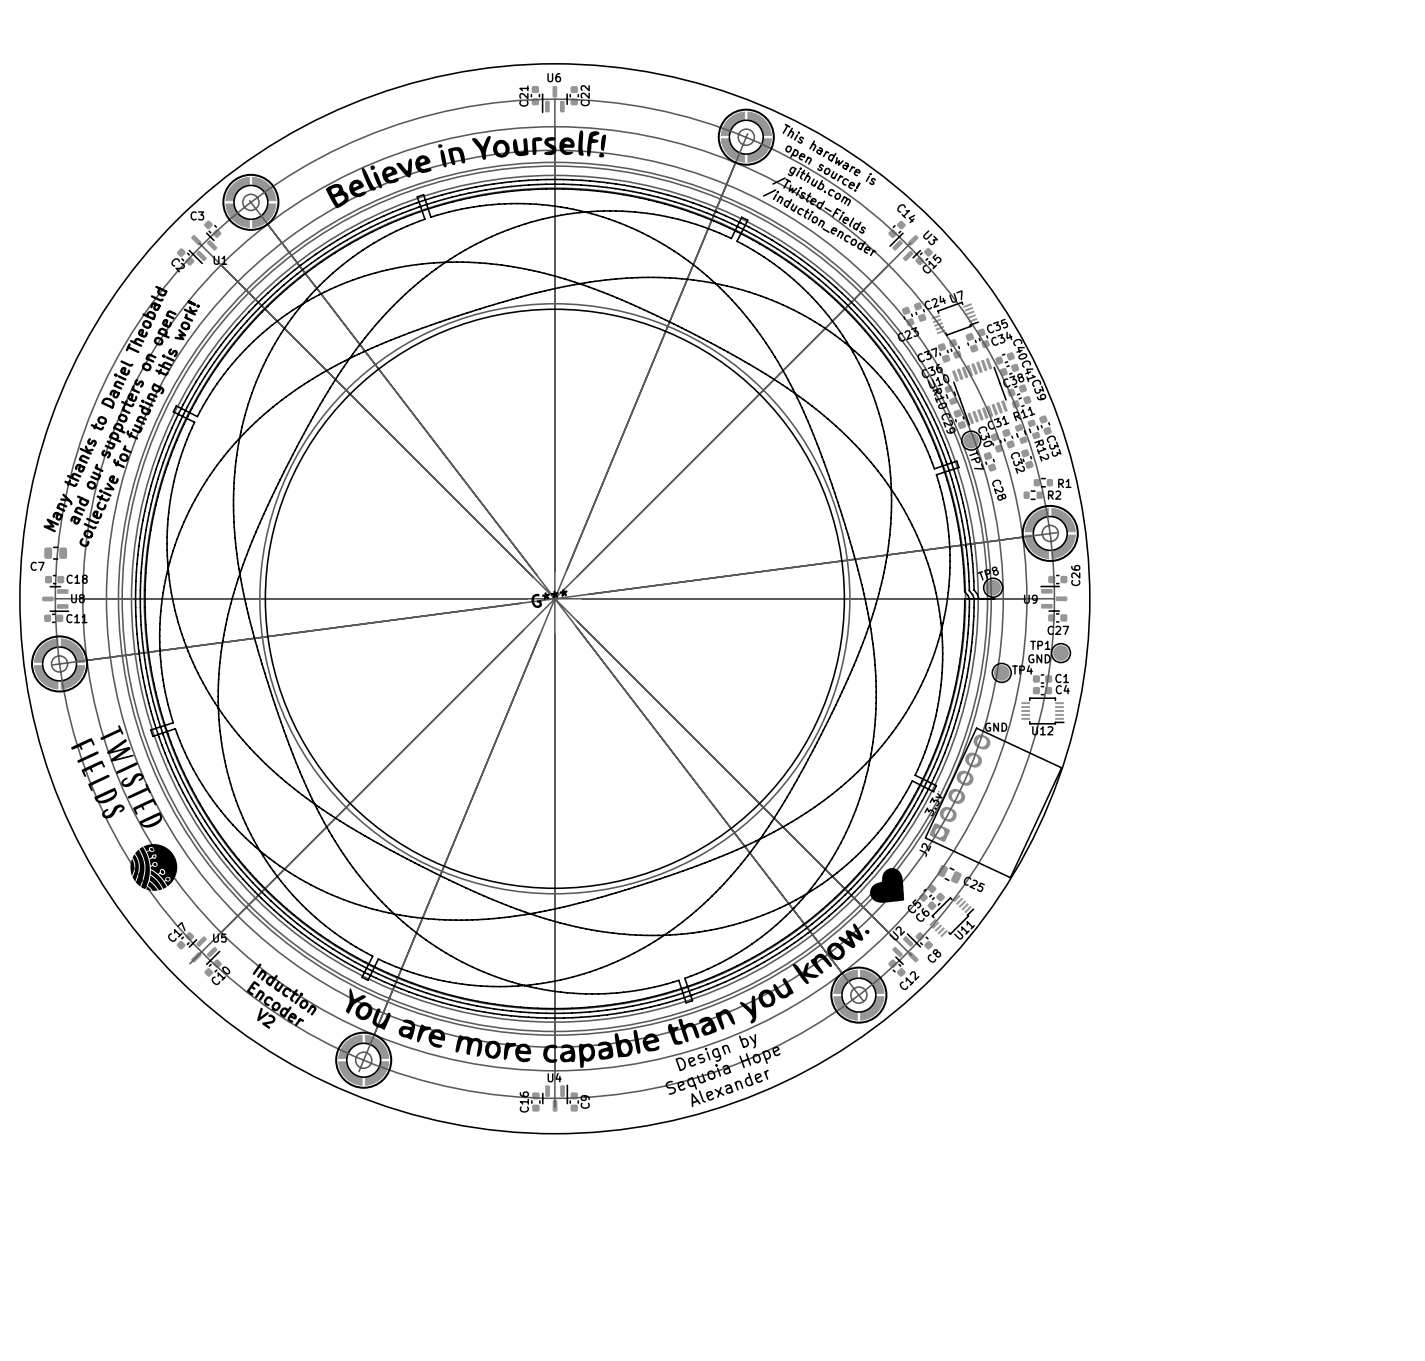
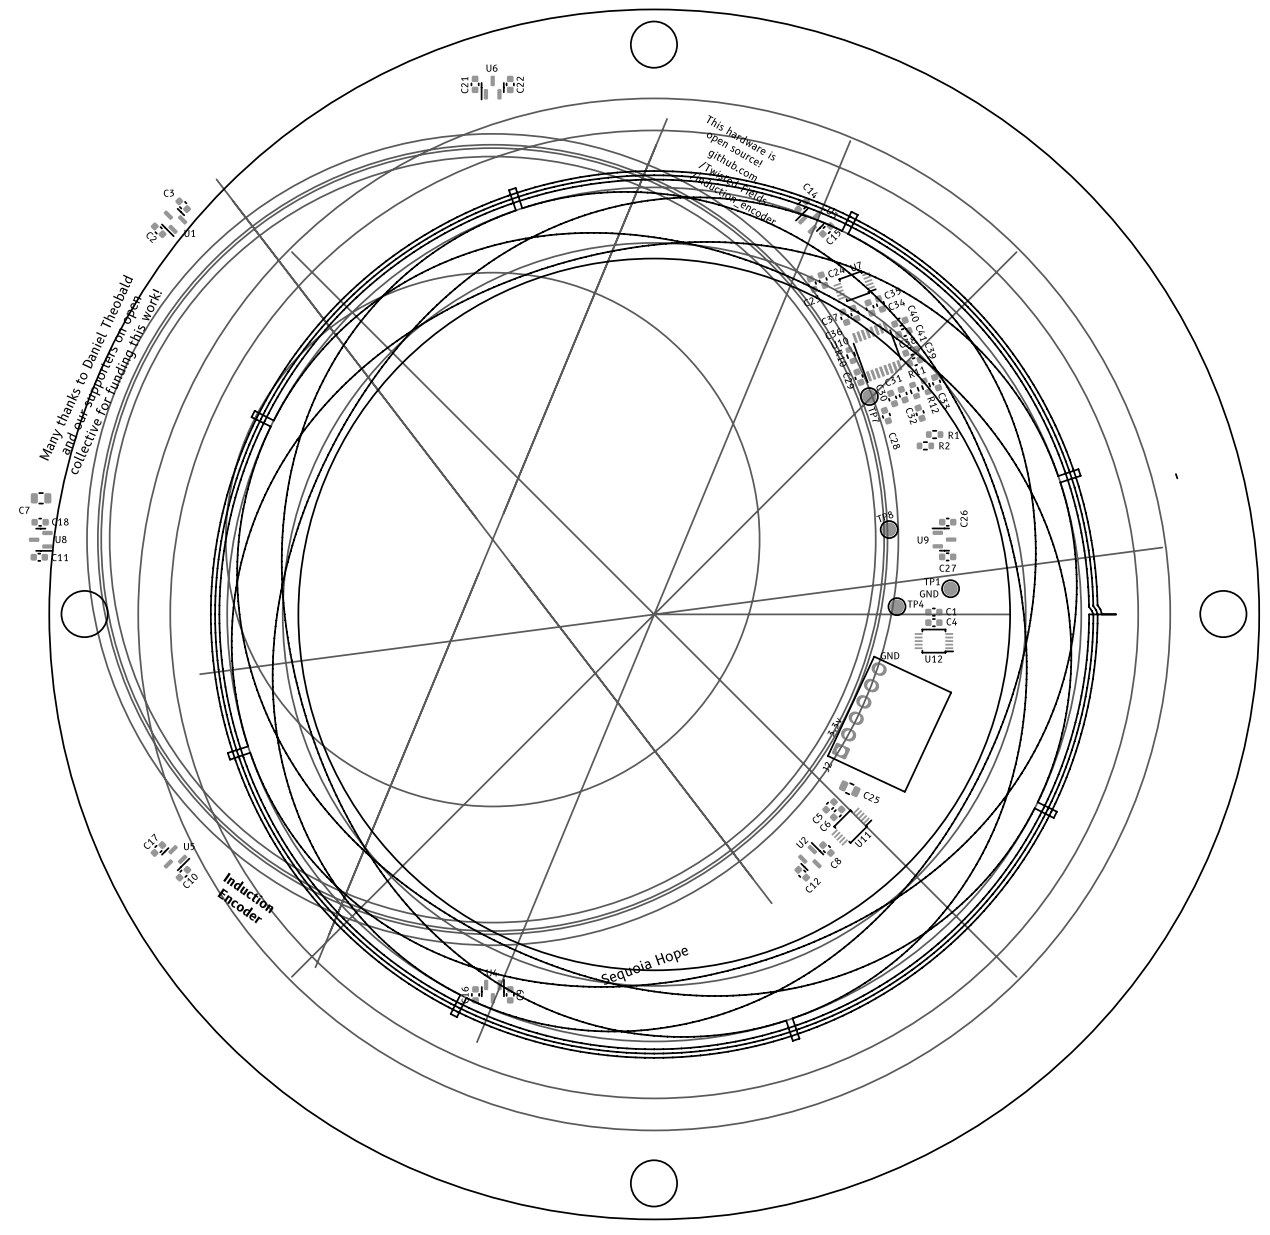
round board edge: none -> [49, 9, 1260, 1220]
round board edge: none -> [630, 20, 678, 69]
round board edge: [19, 63, 1091, 1134] -> none
drawing: [54, 98, 1055, 1099] -> none
line: (554, 99) (554, 1106) -> none
drawing: none -> [137, 98, 1171, 1131]
part: (746, 137) -> none
line: none -> (850, 140) (477, 1042)
part: (250, 202) -> none
line: (585, 212) (622, 211) (659, 215) (696, 224) (731, 238) (741, 217) (747, 220) (737, 241) (769, 260) (798, 284) (824, 311) (849, 346) -> none
line: (585, 212) (542, 204) (504, 203) (467, 207) (430, 217) (423, 194) (417, 196) (424, 219) (390, 234) (357, 253) (328, 276) (302, 303) -> none
line: (585, 212) (620, 223) (653, 238) (683, 257) (715, 283) -> none
line: (585, 212) (548, 217) (513, 227) (480, 241) (445, 262) -> none
line: none -> (687, 197) (725, 206) (762, 220) (796, 237) (834, 261)
line: none -> (687, 197) (647, 200) (609, 208) (572, 219) (531, 237)
line: none -> (687, 197) (726, 198) (766, 204) (804, 215) (842, 230) (851, 211) (857, 214) (848, 233) (882, 254) (914, 278) (943, 306) (972, 342)
line: none -> (687, 197) (640, 192) (600, 192) (561, 198) (522, 208) (515, 187) (509, 190) (515, 210) (478, 225) (443, 245) (411, 269) (382, 296)
line: (199, 243) (911, 955) -> none
line: (910, 243) (189, 963) -> none
line: (445, 262) (479, 262) (512, 266) (579, 283) -> none
line: (445, 262) (404, 266) (369, 274) (335, 286) (302, 303) -> none
line: (445, 262) (418, 282) (393, 305) (349, 358) -> none
line: none -> (531, 237) (569, 233) (606, 233) (642, 235) (683, 242)
line: none -> (531, 237) (499, 256) (469, 277) (441, 301) (411, 330)
line: none -> (531, 237) (488, 246) (451, 259) (416, 275) (382, 296)
line: none -> (683, 242) (750, 261) (819, 291) (882, 328) (937, 372)
line: none -> (683, 242) (725, 242) (761, 245) (797, 251) (834, 261)
line: none -> (683, 242) (614, 250) (542, 269) (472, 296) (411, 330)
line: none -> (291, 252) (1016, 976)
line: none -> (1016, 252) (291, 976)
line: (579, 283) (630, 303) (690, 332) (749, 364) (795, 393) -> none
line: (579, 283) (526, 295) (462, 314) (399, 336) (349, 358) -> none
line: (715, 283) (739, 308) (759, 334) (795, 393) -> none
line: (715, 283) (755, 293) (788, 307) (820, 325) (849, 346) -> none
line: (715, 283) (681, 278) (648, 277) (579, 283) -> none
round board edge: none -> [298, 258, 1011, 971]
line: none -> (834, 261) (875, 277) (909, 295) (942, 317) (972, 342)
line: none -> (834, 261) (863, 284) (889, 310) (913, 338) (937, 372)
line: (302, 303) (281, 333) (263, 365) (250, 398) (239, 438) -> none
line: (302, 303) (267, 328) (240, 354) (216, 384) (197, 416) (176, 405) (173, 411) (194, 422) (180, 457) (171, 493) (167, 531) (168, 568) -> none
round board edge: [265, 309, 845, 889] -> none
line: none -> (382, 296) (346, 325) (318, 353) (294, 385) (273, 420) (254, 410) (251, 417) (270, 426) (255, 463) (244, 502) (238, 541) (237, 581)
line: none -> (382, 296) (357, 326) (335, 358) (317, 393) (301, 434)
line: (849, 346) (876, 372) (900, 401) (919, 434) (934, 468) (956, 461) (958, 467) (936, 474) (945, 511) (949, 548) (948, 586) (941, 629) -> none
line: (849, 346) (866, 379) (879, 413) (887, 448) (891, 489) -> none
line: (349, 358) (320, 404) (288, 463) (259, 523) (239, 573) -> none
line: (349, 358) (290, 393) (264, 414) (239, 438) -> none
line: none -> (411, 330) (368, 385) (330, 449) (301, 517) (282, 585)
line: none -> (411, 330) (378, 355) (350, 378) (324, 405) (301, 434)
line: none -> (972, 342) (992, 376) (1009, 411) (1021, 448) (1031, 491)
line: none -> (972, 342) (999, 371) (1023, 404) (1042, 438) (1058, 476) (1078, 469) (1080, 475) (1060, 482) (1070, 521) (1075, 561) (1076, 601) (1071, 647)
line: (795, 393) (817, 443) (839, 506) (858, 570) (869, 623) -> none
line: (795, 393) (848, 437) (870, 462) (891, 489) -> none
line: none -> (937, 372) (967, 401) (991, 429) (1012, 459) (1031, 491)
line: none -> (937, 372) (972, 433) (999, 502) (1017, 574) (1026, 643)
line: (239, 438) (234, 472) (233, 505) (239, 573) -> none
line: (239, 438) (213, 469) (194, 500) (179, 533) (168, 568) -> none
line: none -> (301, 434) (291, 470) (285, 507) (282, 543) (282, 585)
line: none -> (301, 434) (277, 471) (259, 506) (246, 543) (237, 581)
line: (891, 489) (890, 523) (886, 556) (869, 623) -> none
line: (891, 489) (911, 524) (925, 557) (936, 592) (941, 629) -> none
line: none -> (1175, 474) (1177, 478)
line: (1056, 532) (52, 664) -> none
part: (1050, 533) -> none
line: none -> (1031, 491) (1035, 529) (1035, 566) (1032, 602) (1026, 643)
line: none -> (1031, 491) (1049, 532) (1060, 569) (1068, 607) (1071, 647)
line: (168, 568) (173, 604) (183, 639) (197, 672) (218, 708) -> none
line: (168, 568) (160, 611) (159, 648) (164, 686) (173, 722) (150, 730) (152, 736) (175, 728) (190, 763) (209, 795) (232, 824) (259, 850) -> none
line: (239, 573) (222, 640) (218, 673) (218, 708) -> none
line: (239, 573) (251, 627) (270, 691) (292, 753) (314, 804) -> none
line: (974, 589) (970, 546) (963, 503) (950, 460) (937, 428) (918, 389) (894, 352) (866, 318) (841, 293) (808, 264) (779, 244) (749, 227) (709, 208) (667, 194) (624, 185) (581, 180) (546, 179) (502, 182) (459, 190) (416, 202) (384, 215) (345, 235) (308, 259) (274, 287) (249, 311) (220, 345) (200, 374) (183, 404) (165, 444) (151, 486) (141, 528) (136, 572) (135, 607) (141, 668) (156, 728) (179, 785) (210, 838) (249, 885) (294, 927) (345, 961) (400, 988) (459, 1007) (519, 1016) (581, 1017) (642, 1008) (701, 991) (756, 966) (808, 932) (854, 892) (894, 845) (926, 793) (950, 736) (966, 677) (971, 642) (973, 625) (973, 616) (974, 607) (974, 598) (972, 594) (969, 590) (966, 546) (958, 504) (937, 438) (909, 384) (874, 334) (832, 290) (784, 253) (731, 223) (674, 201) (615, 188) (554, 184) (494, 188) (435, 201) (378, 223) (325, 253) (277, 290) (235, 334) (200, 384) (169, 446) (151, 504) (141, 564) (141, 624) (149, 684) (169, 751) (195, 806) (229, 856) (271, 901) (311, 934) (362, 966) (410, 987) (468, 1004) (528, 1012) (580, 1012) (632, 1006) (682, 993) (731, 973) (777, 948) (819, 918) (862, 876) (900, 828) (926, 783) (946, 735) (962, 676) (968, 633) (969, 616) (969, 607) (969, 598) (967, 595) (964, 591) (962, 555) (955, 513) (939, 455) (914, 401) (886, 357) (847, 312) (809, 277) (759, 243) (713, 220) (665, 204) (614, 193) (563, 188) (503, 192) (444, 204) (396, 220) (349, 243) (300, 277) (262, 312) (223, 357) (195, 401) (170, 455) (155, 505) (146, 564) (145, 624) (152, 675) (167, 733) (187, 781) (213, 825) (250, 873) (287, 909) (335, 944) (388, 973) (436, 991) (486, 1002) (537, 1008) (597, 1006) (648, 997) (697, 982) (744, 962) (788, 935) (829, 903) (865, 866) (891, 832) (922, 781) (947, 717) (960, 658) (964, 598) (994, 598) -> none
line: (974, 590) (978, 598) -> none
line: (55, 598) (1054, 598) -> none
G***: (597, 599) -> none
line: none -> (1162, 547) (200, 674)
line: (869, 623) (849, 674) (821, 734) (789, 792) (760, 839) -> none
line: (869, 623) (876, 692) (874, 725) (870, 759) -> none
line: (941, 629) (930, 664) (914, 697) (895, 727) (870, 759) -> none
line: (941, 629) (942, 666) (938, 703) (929, 740) (915, 775) (936, 785) (933, 791) (912, 780) (892, 813) (869, 842) (842, 868) (806, 893) -> none
line: none -> (237, 581) (240, 620) (247, 659) (259, 696) (277, 736)
line: none -> (237, 581) (232, 627) (232, 667) (237, 707) (248, 746) (227, 752) (230, 759) (250, 752) (265, 789) (285, 824) (309, 857) (336, 886)
line: none -> (282, 585) (290, 654) (309, 726) (336, 795) (370, 856)
line: none -> (282, 585) (275, 626) (272, 662) (273, 699) (277, 736)
round board edge: none -> [60, 590, 109, 638]
round board edge: none -> [1199, 590, 1248, 638]
part: (59, 663) -> none
line: none -> (1097, 605) (1094, 558) (1087, 522) (1075, 477) (1059, 434) (1038, 392) (1018, 361) (989, 324) (964, 297) (929, 266) (891, 240) (851, 217) (817, 202) (782, 189) (737, 178) (691, 172) (644, 171) (598, 174) (562, 180) (517, 192) (473, 209) (432, 230) (401, 250) (364, 278) (337, 304) (306, 339) (279, 376) (257, 417) (241, 451) (229, 486) (218, 531) (212, 577) (210, 623) (217, 688) (232, 751) (257, 811) (290, 867) (331, 917) (378, 961) (432, 998) (491, 1026) (552, 1046) (617, 1056) (682, 1056) (746, 1048) (808, 1030) (867, 1002) (922, 967) (971, 924) (1012, 875) (1047, 819) (1072, 760) (1089, 697) (1096, 651) (1097, 633) (1097, 623) (1097, 614) (1096, 610) (1093, 606) (1089, 559) (1081, 514) (1071, 478) (1059, 444) (1029, 386) (992, 334) (948, 288) (897, 248) (841, 217) (781, 194) (718, 180) (654, 175) (590, 180) (527, 194) (467, 217) (411, 248) (360, 288) (315, 334) (278, 386) (260, 419) (245, 452) (226, 514) (216, 577) (215, 642) (224, 705) (242, 767) (269, 825) (304, 879) (327, 908) (353, 934) (396, 969) (450, 1003) (501, 1026) (562, 1043) (617, 1052) (672, 1053) (736, 1045) (789, 1032) (849, 1007) (897, 980) (941, 946) (980, 908) (1020, 857) (1047, 809) (1071, 750) (1085, 696) (1090, 660) (1092, 632) (1093, 623) (1093, 614) (1091, 610) (1089, 606) (1086, 568) (1079, 524) (1061, 462) (1039, 412) (1006, 358) (964, 310) (924, 273) (871, 237) (822, 213) (771, 195) (717, 184) (663, 179) (599, 182) (537, 195) (485, 213) (436, 237) (384, 273) (343, 310) (302, 358) (268, 412) (246, 462) (230, 515) (220, 578) (219, 632) (227, 695) (240, 748) (264, 807) (292, 855) (331, 905) (370, 943) (421, 981) (469, 1007) (528, 1030) (581, 1043) (636, 1048) (690, 1047) (753, 1037) (805, 1022) (855, 999) (902, 971) (945, 937) (983, 898) (1016, 855) (1047, 799) (1070, 740) (1084, 677) (1089, 614) (1116, 614)
line: none -> (1097, 605) (1101, 614)
line: none -> (653, 614) (1010, 614)
line: (218, 708) (222, 748) (230, 783) (243, 817) (259, 850) -> none
line: (218, 708) (238, 735) (261, 759) (314, 804) -> none
line: none -> (1026, 643) (1026, 685) (1023, 721) (1017, 758) (1007, 794)
line: none -> (1026, 643) (1007, 710) (977, 779) (939, 843) (896, 898)
line: none -> (1071, 647) (1069, 686) (1063, 726) (1053, 765) (1037, 802) (1056, 811) (1053, 817) (1034, 808) (1014, 842) (990, 874) (962, 903) (925, 932)
line: none -> (1071, 647) (1061, 685) (1048, 722) (1031, 756) (1007, 794)
line: (870, 759) (845, 783) (819, 803) (760, 839) -> none
line: (870, 759) (859, 798) (846, 832) (828, 864) (806, 893) -> none
part: (936, 791) -> none
line: (314, 804) (360, 833) (419, 865) (479, 893) (530, 913) -> none
line: (314, 804) (349, 863) (370, 889) (394, 914) -> none
line: none -> (277, 736) (296, 769) (317, 799) (340, 827) (370, 856)
line: none -> (277, 736) (286, 780) (299, 816) (315, 852) (336, 886)
line: (760, 839) (716, 892) (691, 914) (664, 935) -> none
line: (760, 839) (709, 860) (647, 883) (583, 902) (530, 913) -> none
line: (259, 850) (289, 872) (321, 890) (354, 903) (394, 914) -> none
line: (259, 850) (285, 886) (310, 913) (340, 936) (372, 956) (362, 977) (367, 980) (378, 959) (413, 973) (449, 982) (487, 986) (524, 985) -> none
line: none -> (1007, 794) (991, 835) (973, 870) (951, 902) (925, 932)
line: none -> (1007, 794) (983, 823) (957, 850) (930, 873) (896, 898)
line: (806, 893) (774, 910) (739, 923) (704, 931) (664, 935) -> none
line: (806, 893) (781, 920) (751, 944) (719, 963) (684, 978) (692, 1000) (686, 1002) (678, 980) (642, 989) (604, 993) (567, 992) (524, 985) -> none
line: (530, 913) (461, 920) (428, 918) (394, 914) -> none
line: (530, 913) (596, 930) (629, 934) (664, 935) -> none
line: (394, 914) (425, 939) (456, 958) (489, 974) (524, 985) -> none
line: (664, 935) (628, 955) (595, 969) (560, 979) (524, 985) -> none
line: none -> (370, 856) (425, 899) (489, 937) (557, 967) (624, 986)
line: none -> (370, 856) (394, 890) (418, 918) (445, 943) (474, 967)
line: none -> (336, 886) (365, 922) (393, 950) (425, 974) (460, 994) (450, 1013) (456, 1017) (466, 997) (503, 1013) (542, 1023) (581, 1030) (621, 1031)
line: none -> (336, 886) (366, 911) (398, 933) (432, 951) (474, 967)
part: (858, 995) -> none
line: none -> (896, 898) (835, 932) (766, 959) (694, 978) (624, 986)
line: none -> (896, 898) (867, 927) (839, 951) (809, 972) (776, 991)
text: V2 (266, 1018) -> none
line: none -> (925, 932) (896, 959) (864, 983) (829, 1002) (792, 1018) (799, 1038) (792, 1040) (786, 1020) (747, 1030) (707, 1036) (667, 1036) (621, 1031)
line: none -> (925, 932) (892, 953) (856, 969) (820, 981) (776, 991)
text: Design by (715, 1052) -> none
part: (363, 1060) -> none
line: none -> (474, 967) (511, 991) (546, 1008) (583, 1022) (621, 1031)
line: none -> (474, 967) (510, 977) (547, 983) (583, 986) (624, 986)
text: Alexander (730, 1088) -> none
line: none -> (624, 986) (666, 993) (702, 995) (739, 995) (776, 991)
line: none -> (776, 991) (736, 1009) (699, 1020) (660, 1028) (621, 1031)
round board edge: none -> [630, 1159, 678, 1208]

